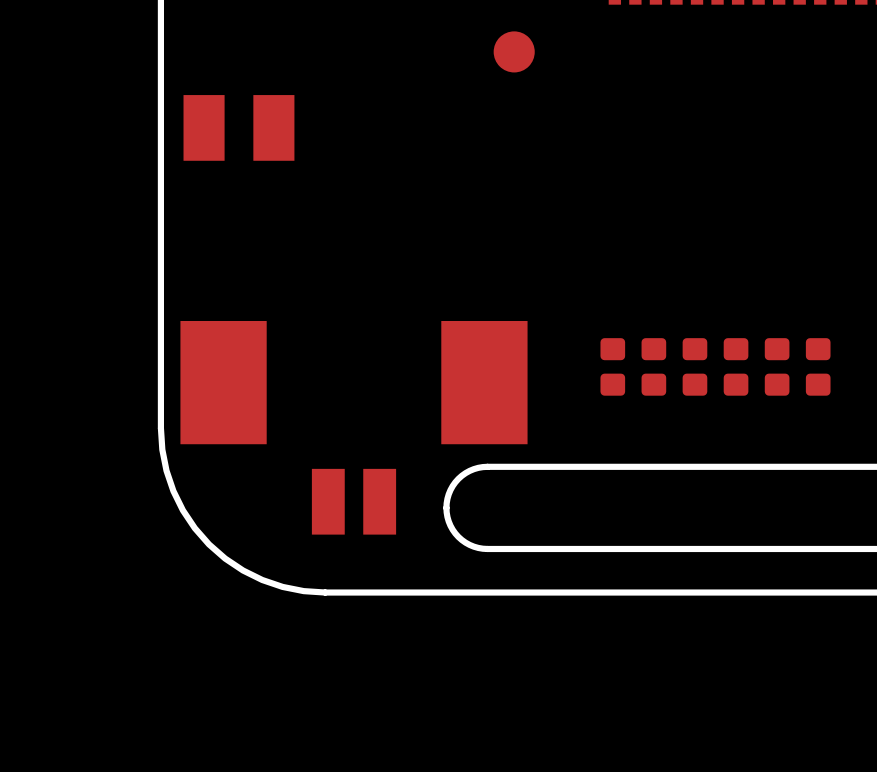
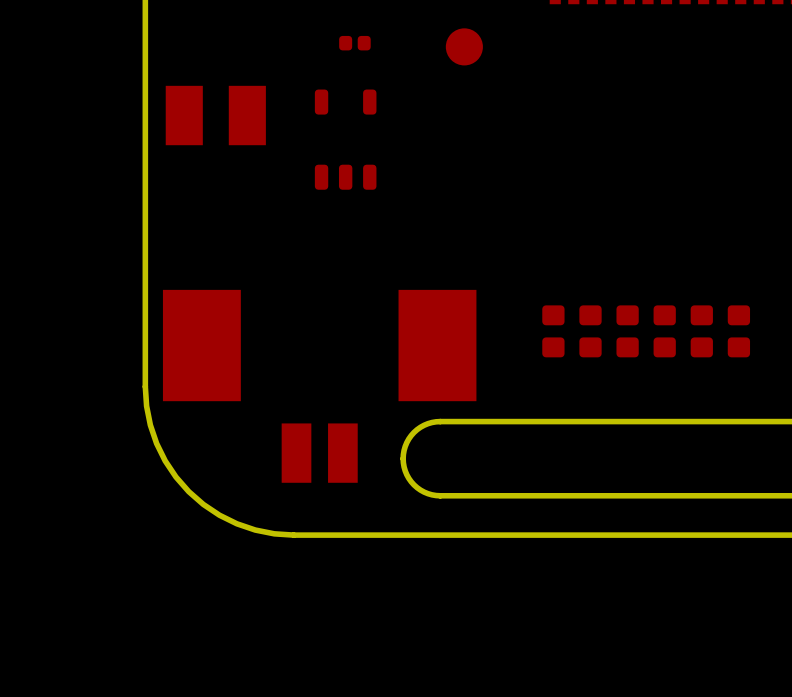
part: none -> (354, 43)
part: none -> (345, 139)

